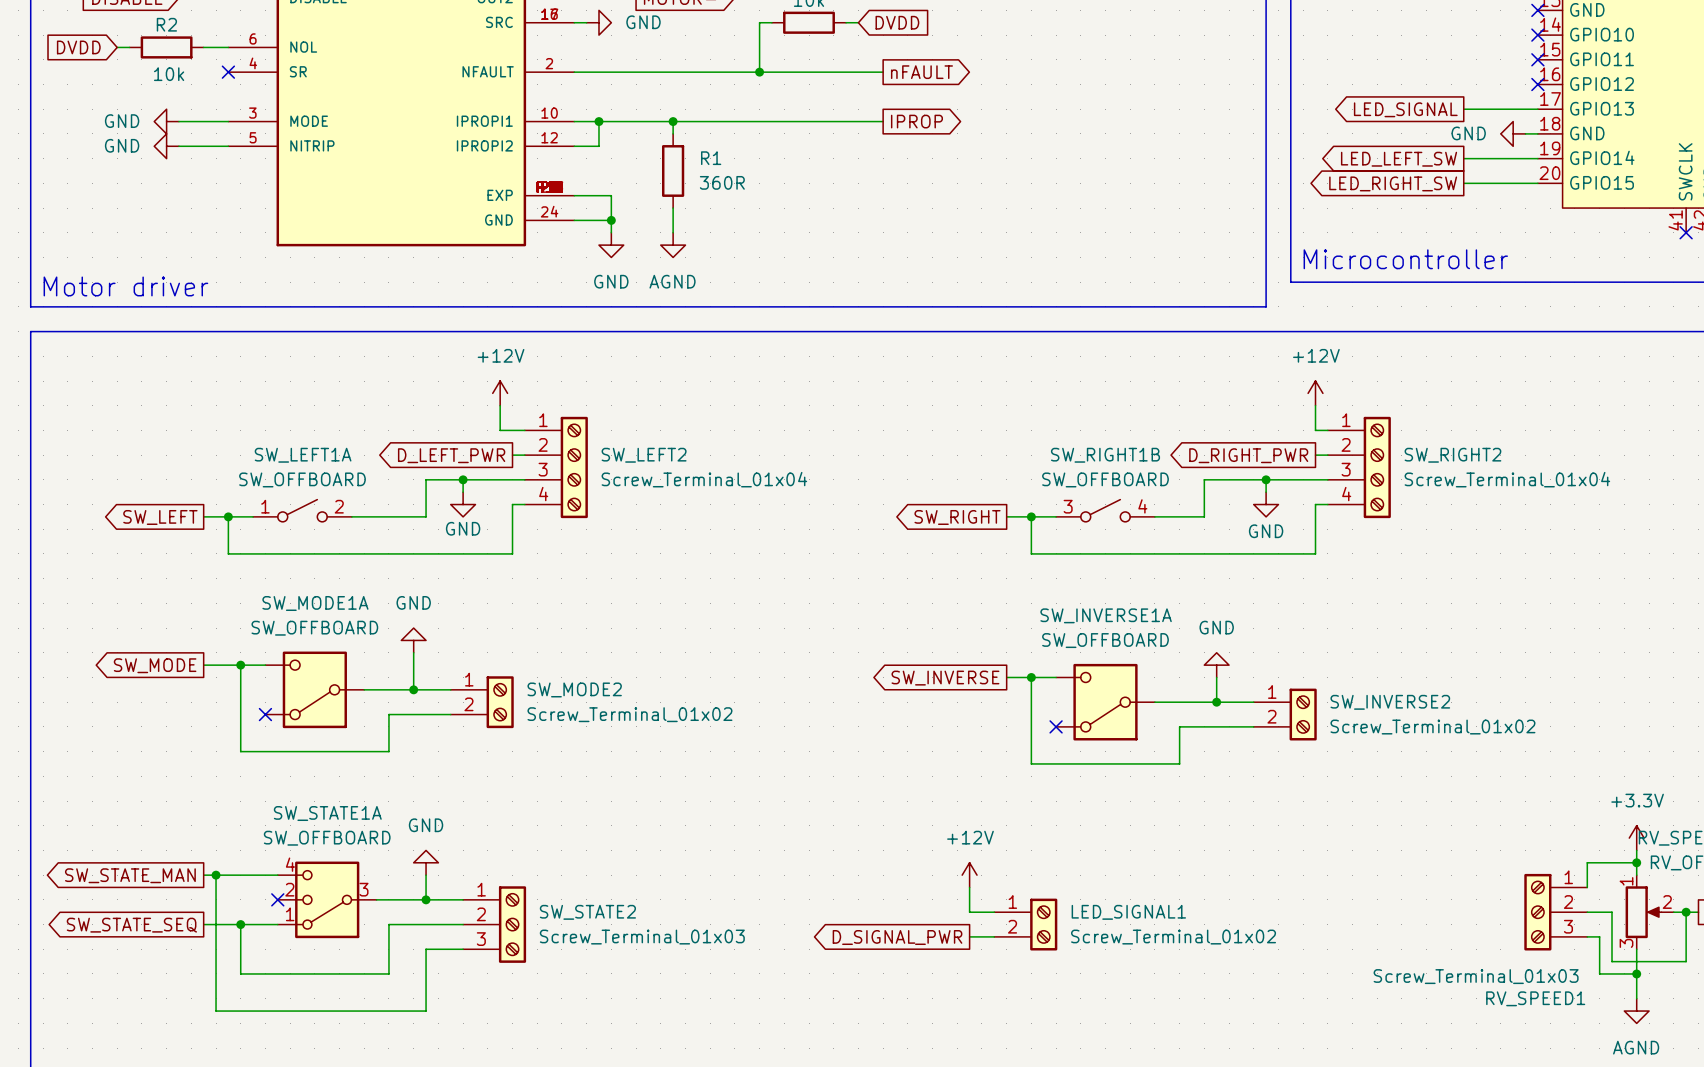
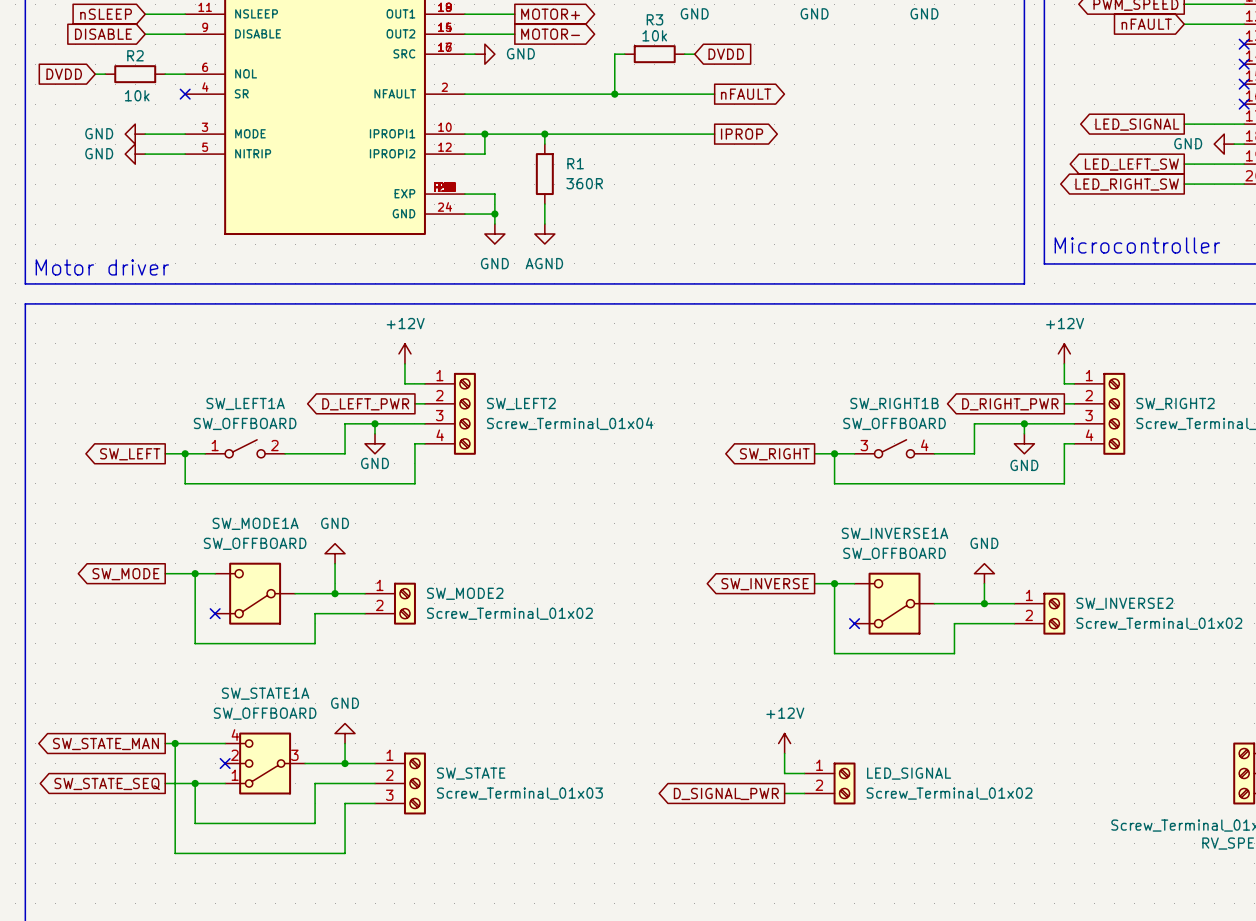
SW_STATE2 name: SW_STATE2 (587, 912) -> SW_STATE (471, 773)
LED_SIGNAL1 name: LED_SIGNAL1 (1128, 912) -> LED_SIGNAL (909, 773)

